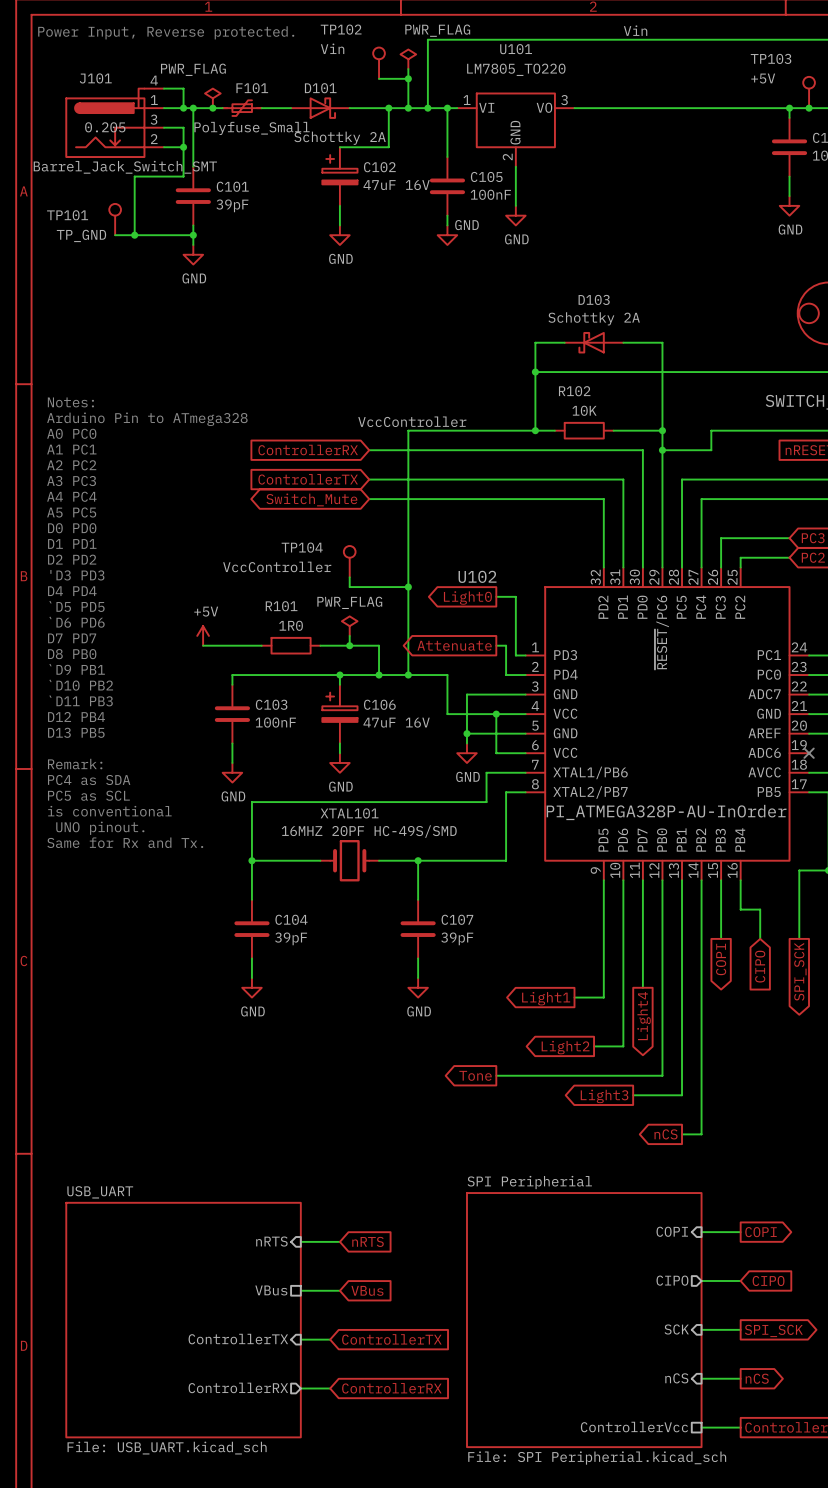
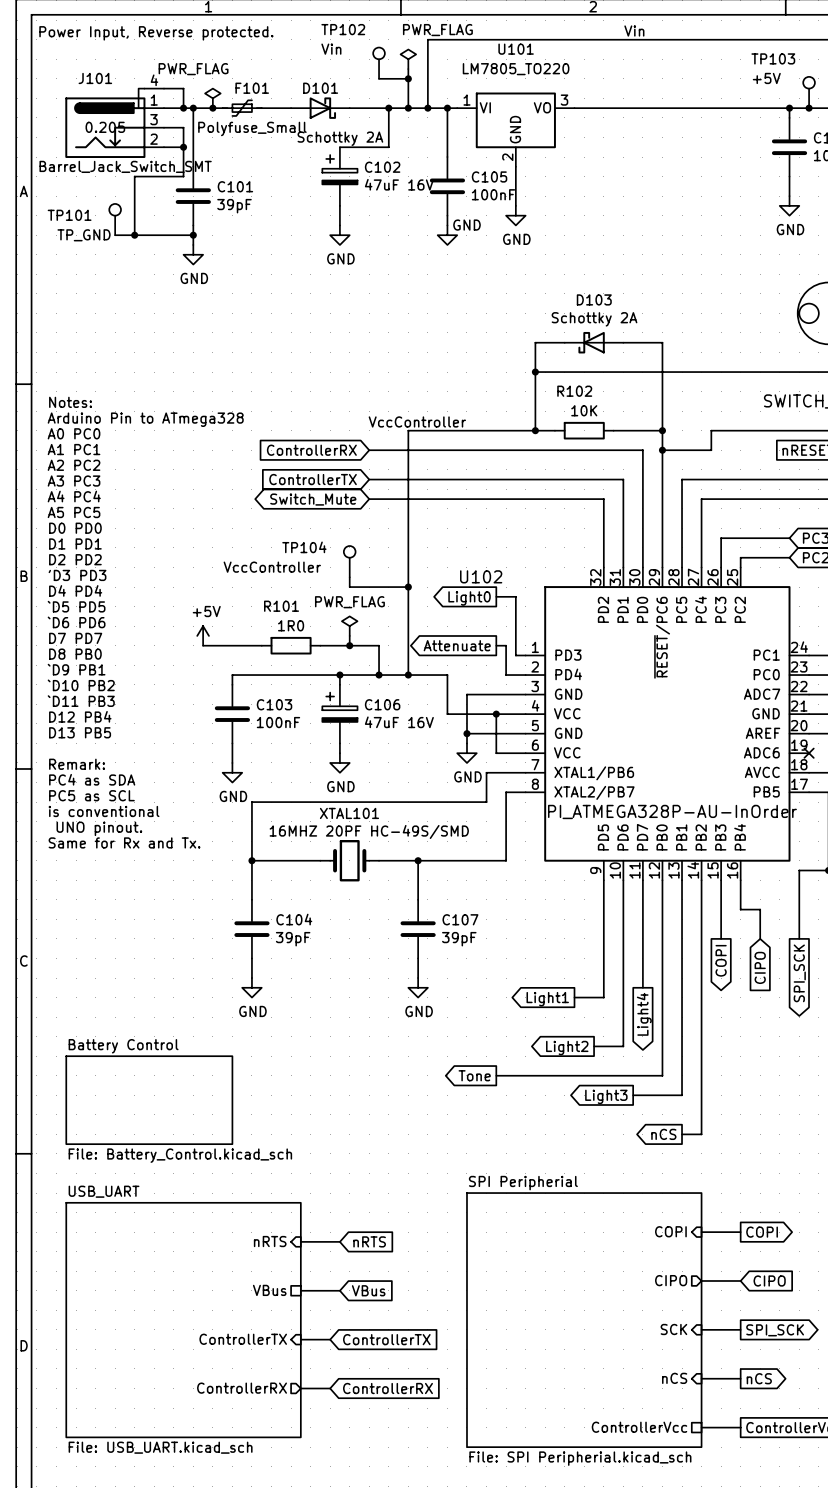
sheet Battery Control: none -> File: Battery_Control.kicad_sch (149, 1100)

